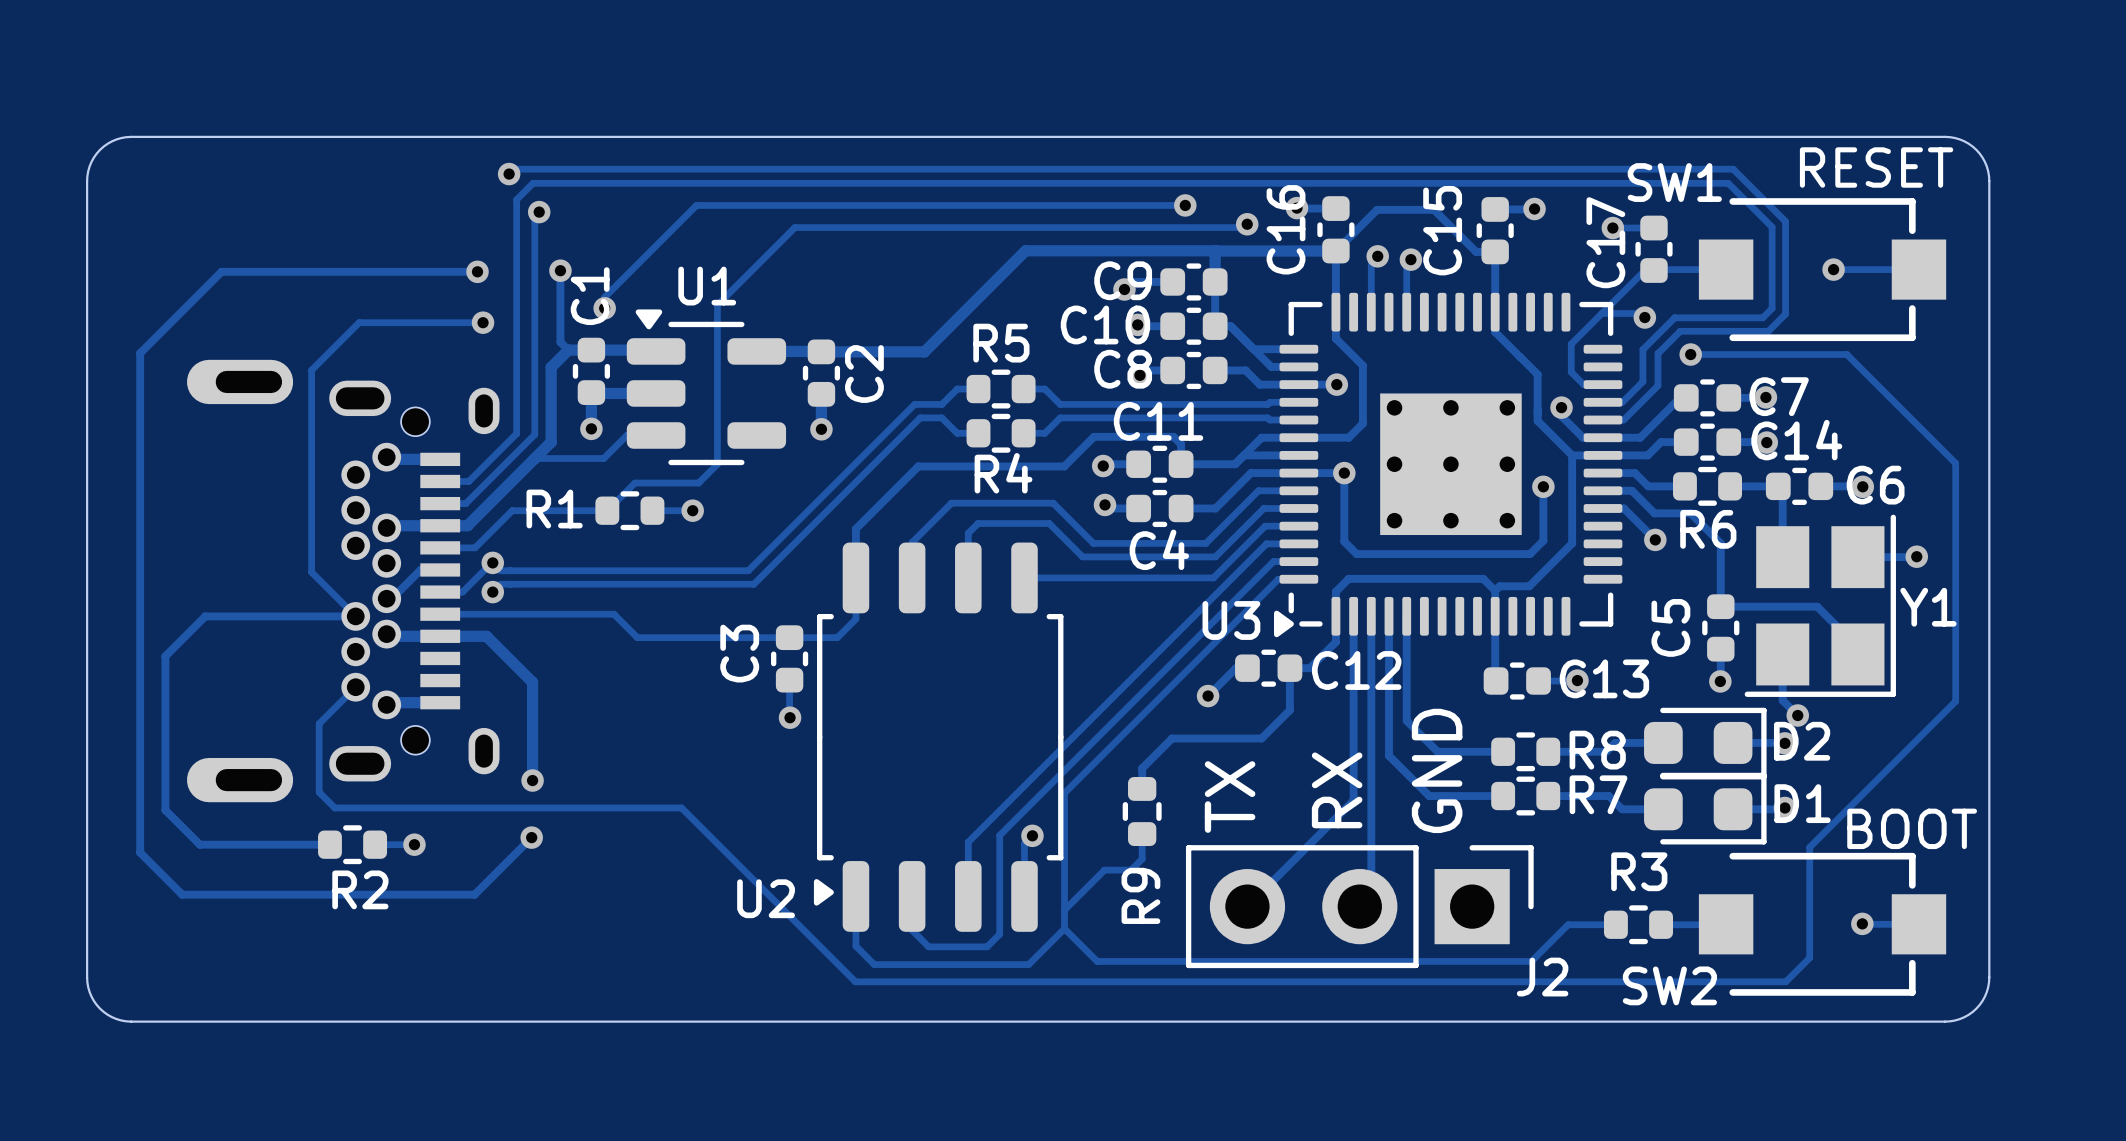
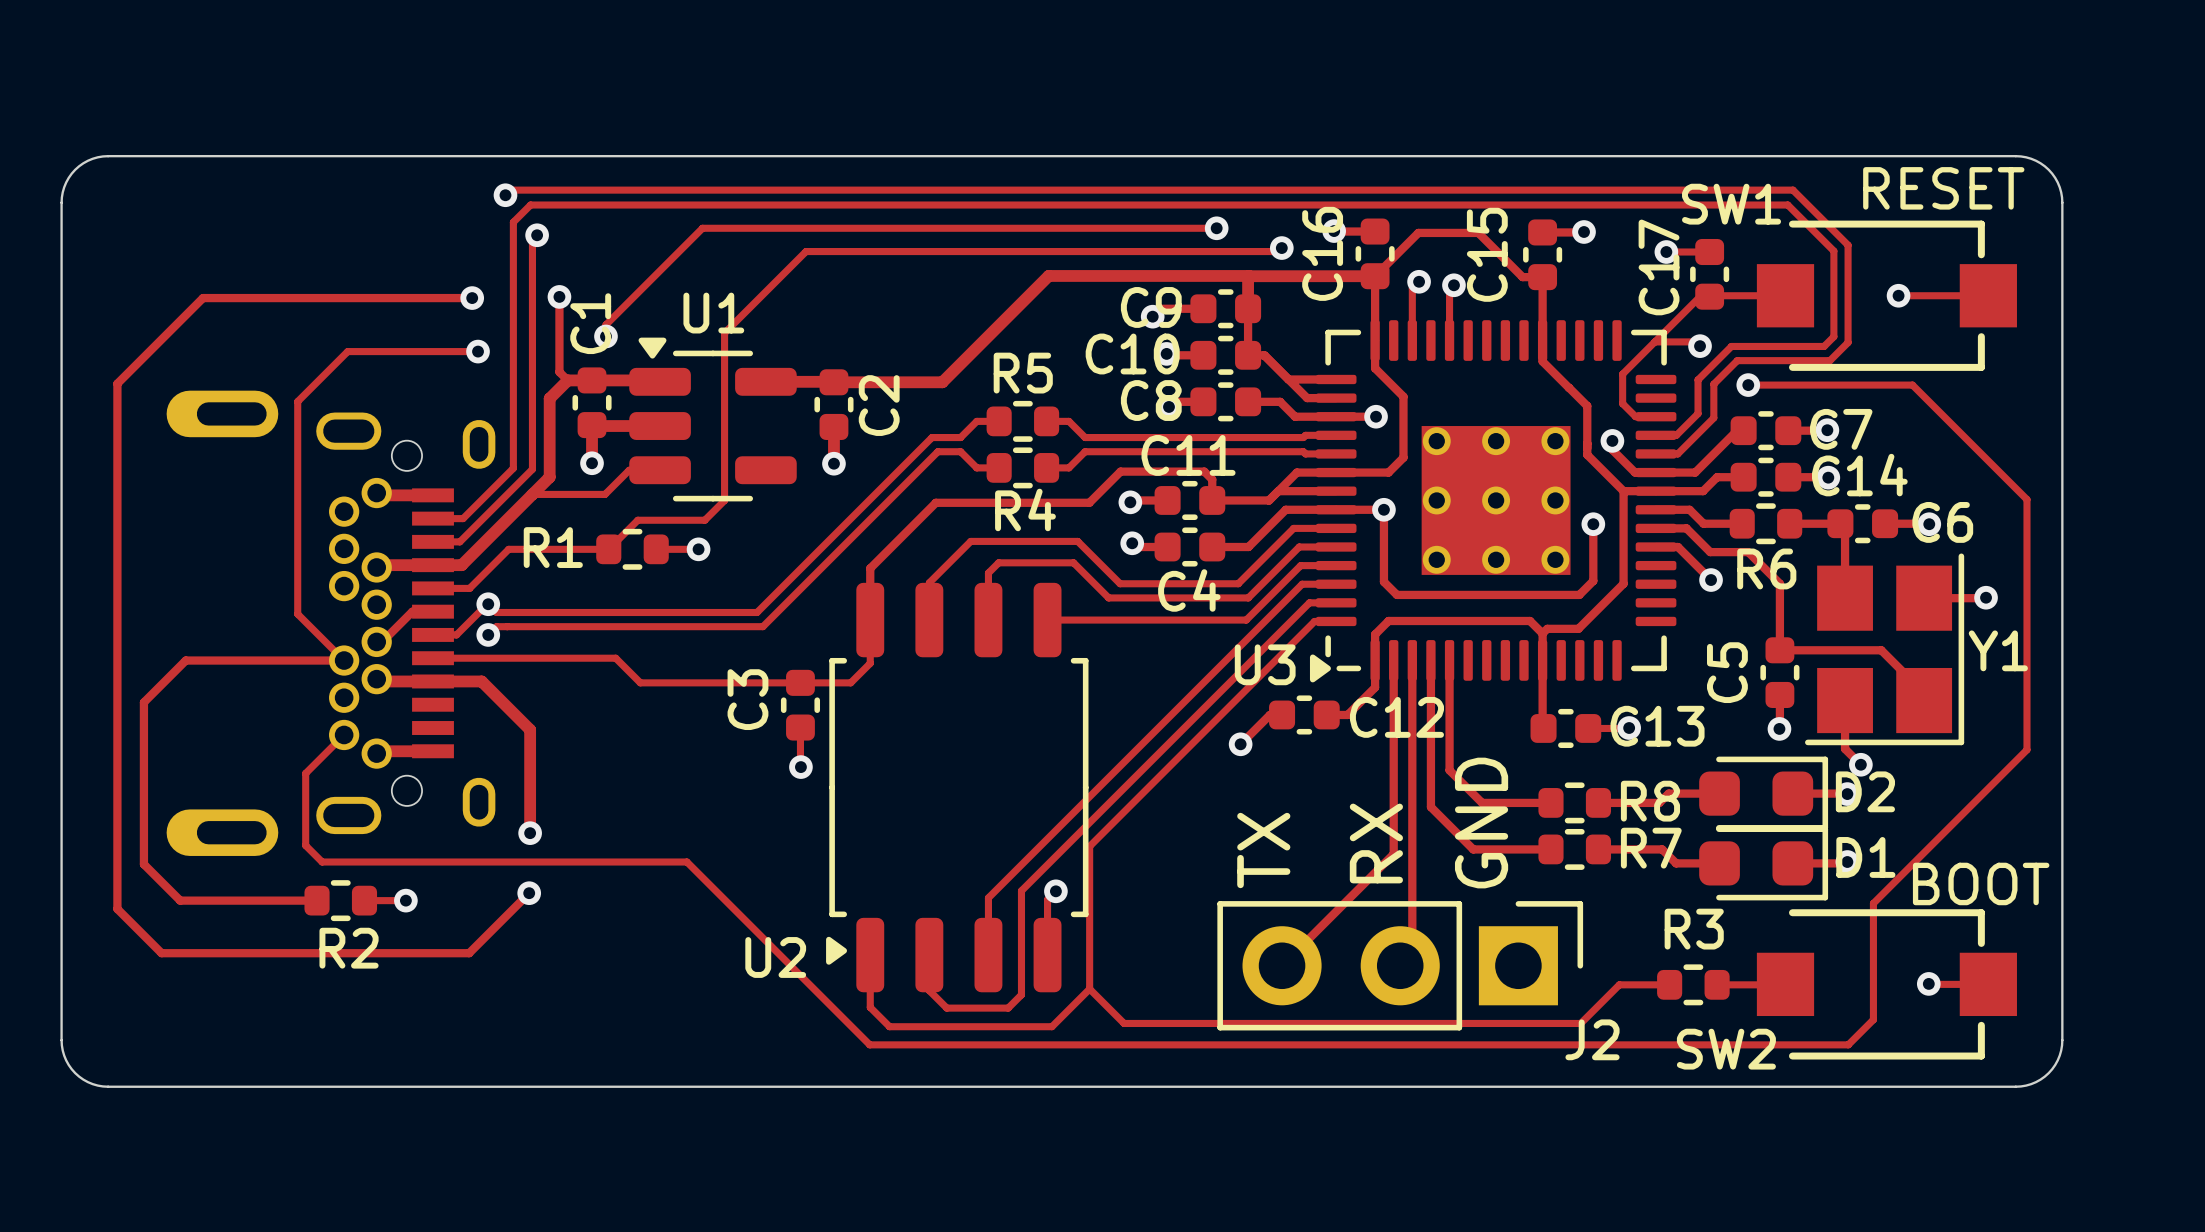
track: (1289, 668) (1289, 710) (1261, 738) (1172, 738) (1142, 768) (1142, 788) -> none
R9: (1142, 811) -> none
track: (1142, 834) (1142, 859) (1131, 870) (1104, 870) (1064, 910) -> none

